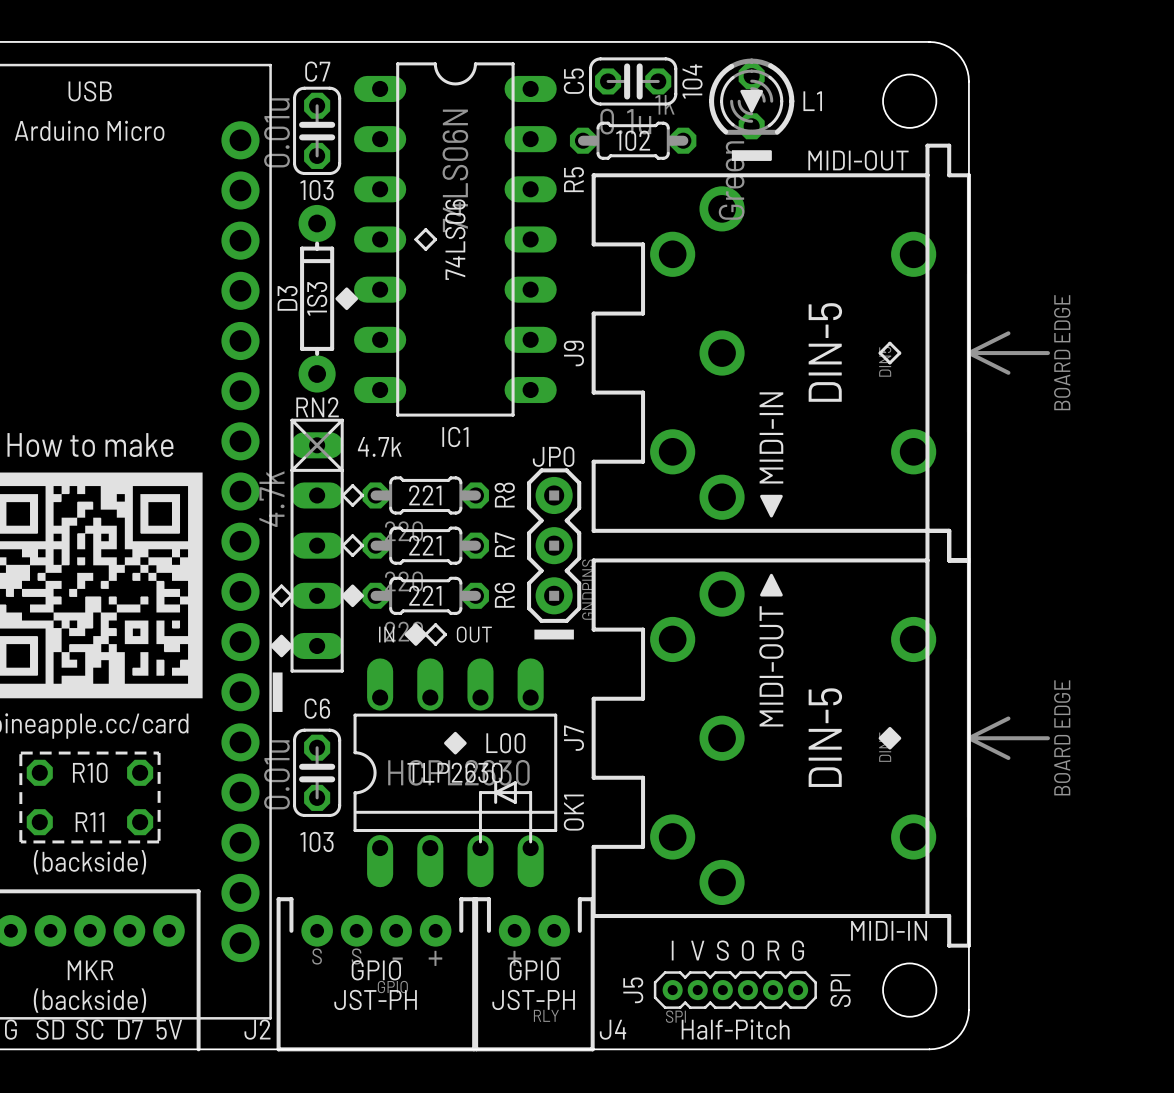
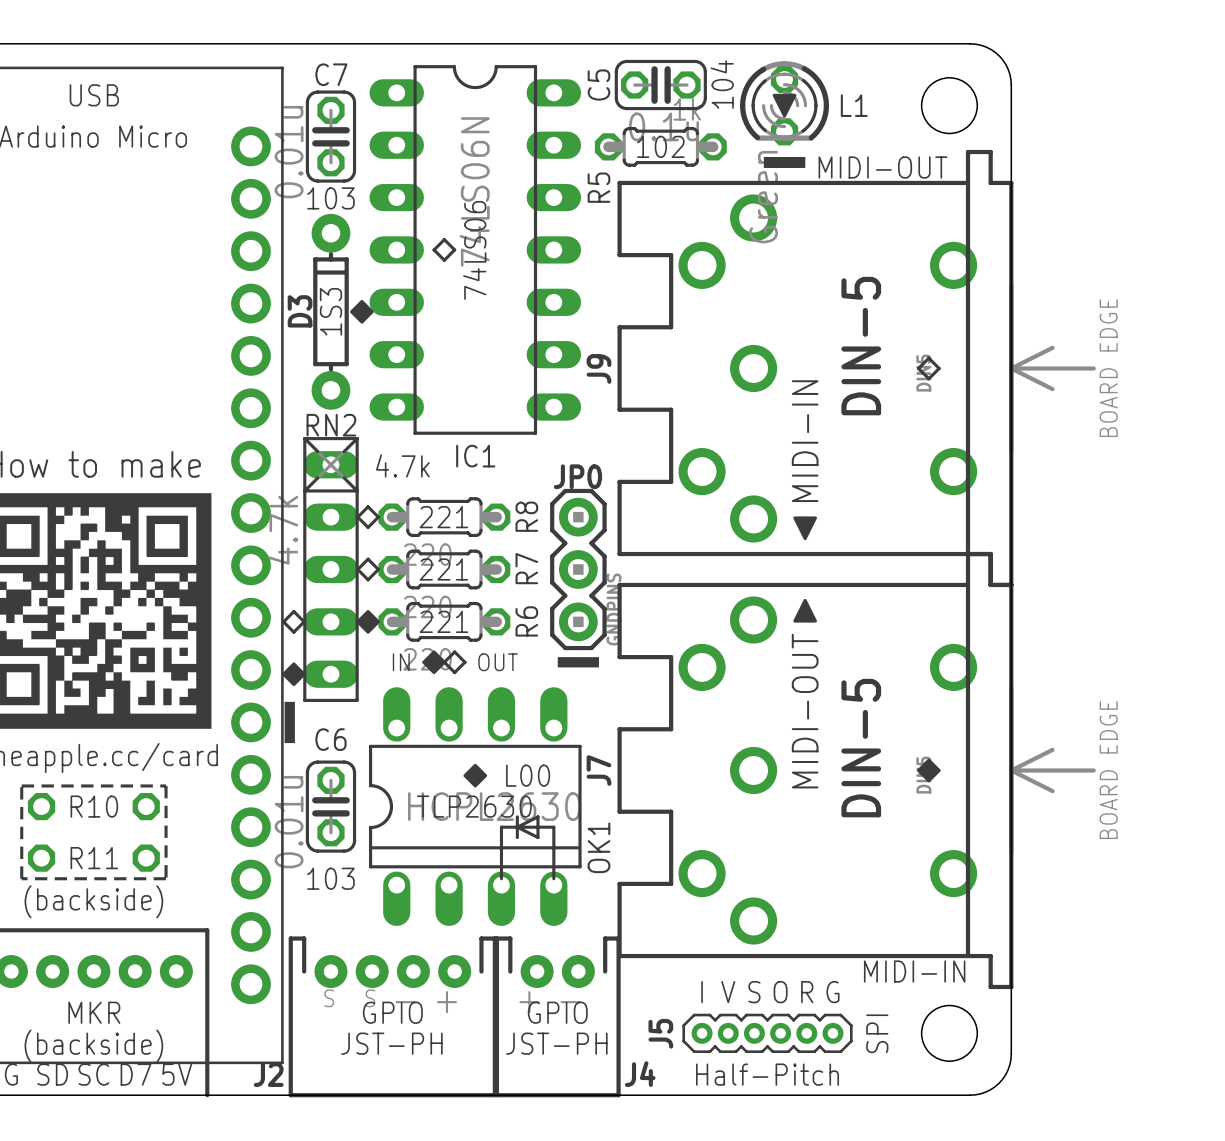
J2 value: GPIO (392, 987) -> none
J4 value: RLY (546, 1015) -> none
J5 value: SPI (675, 1016) -> none

